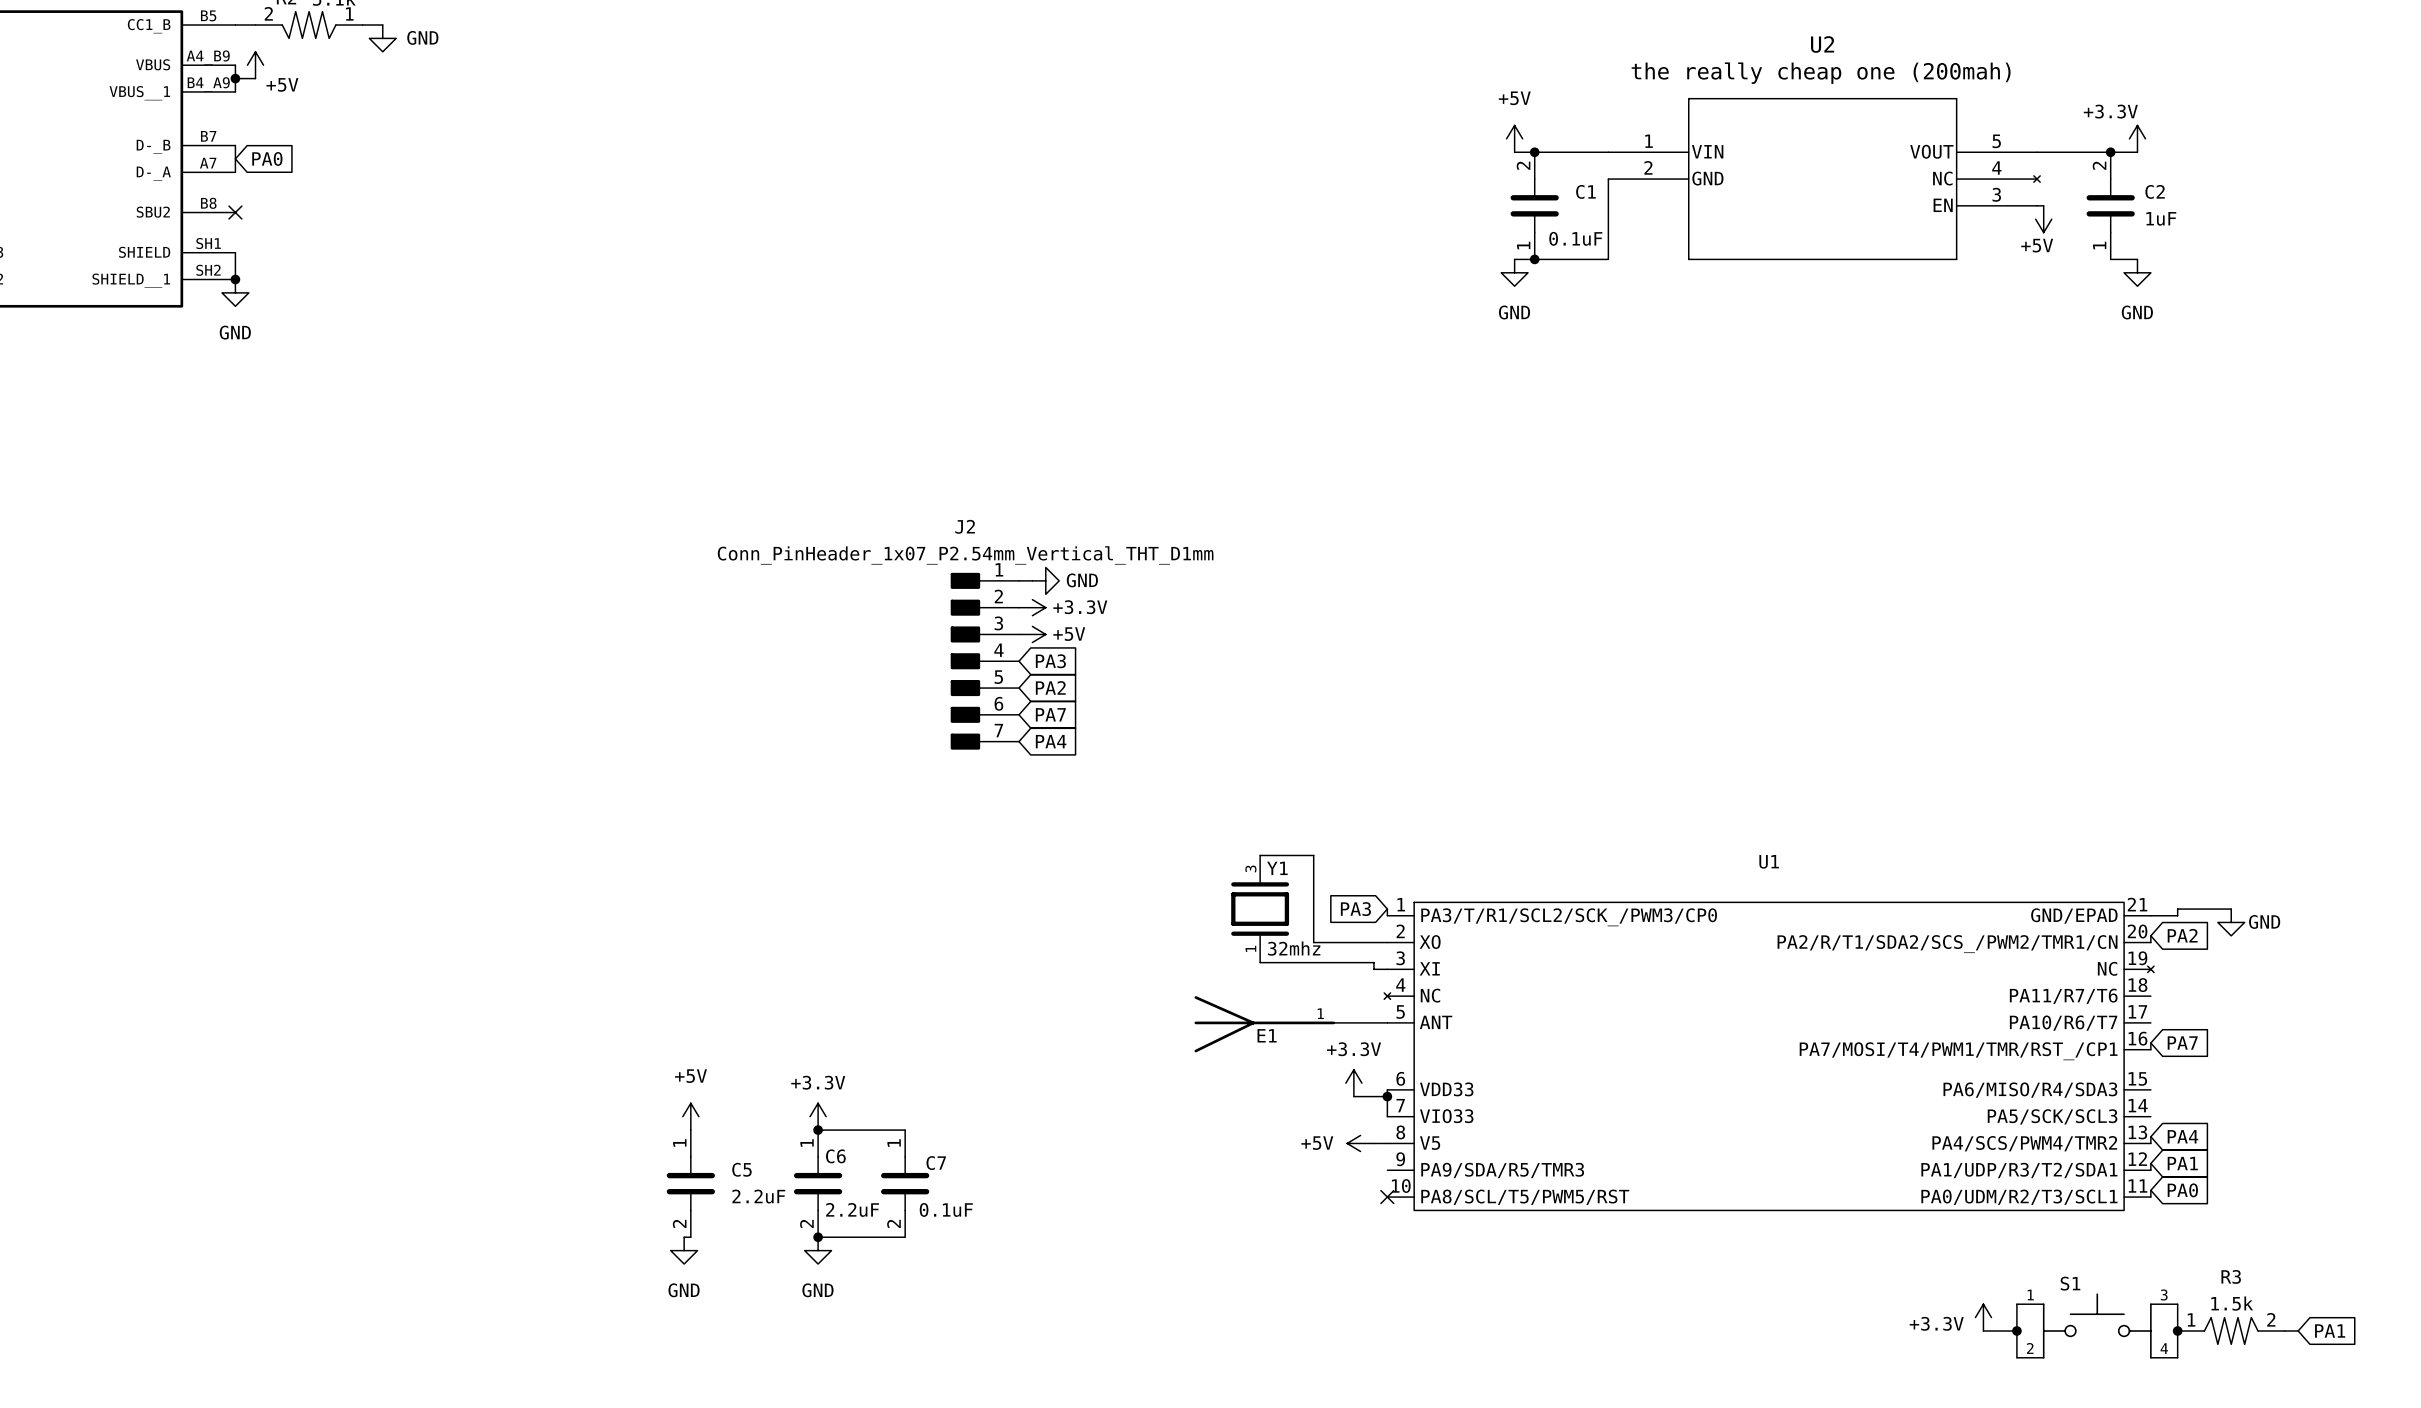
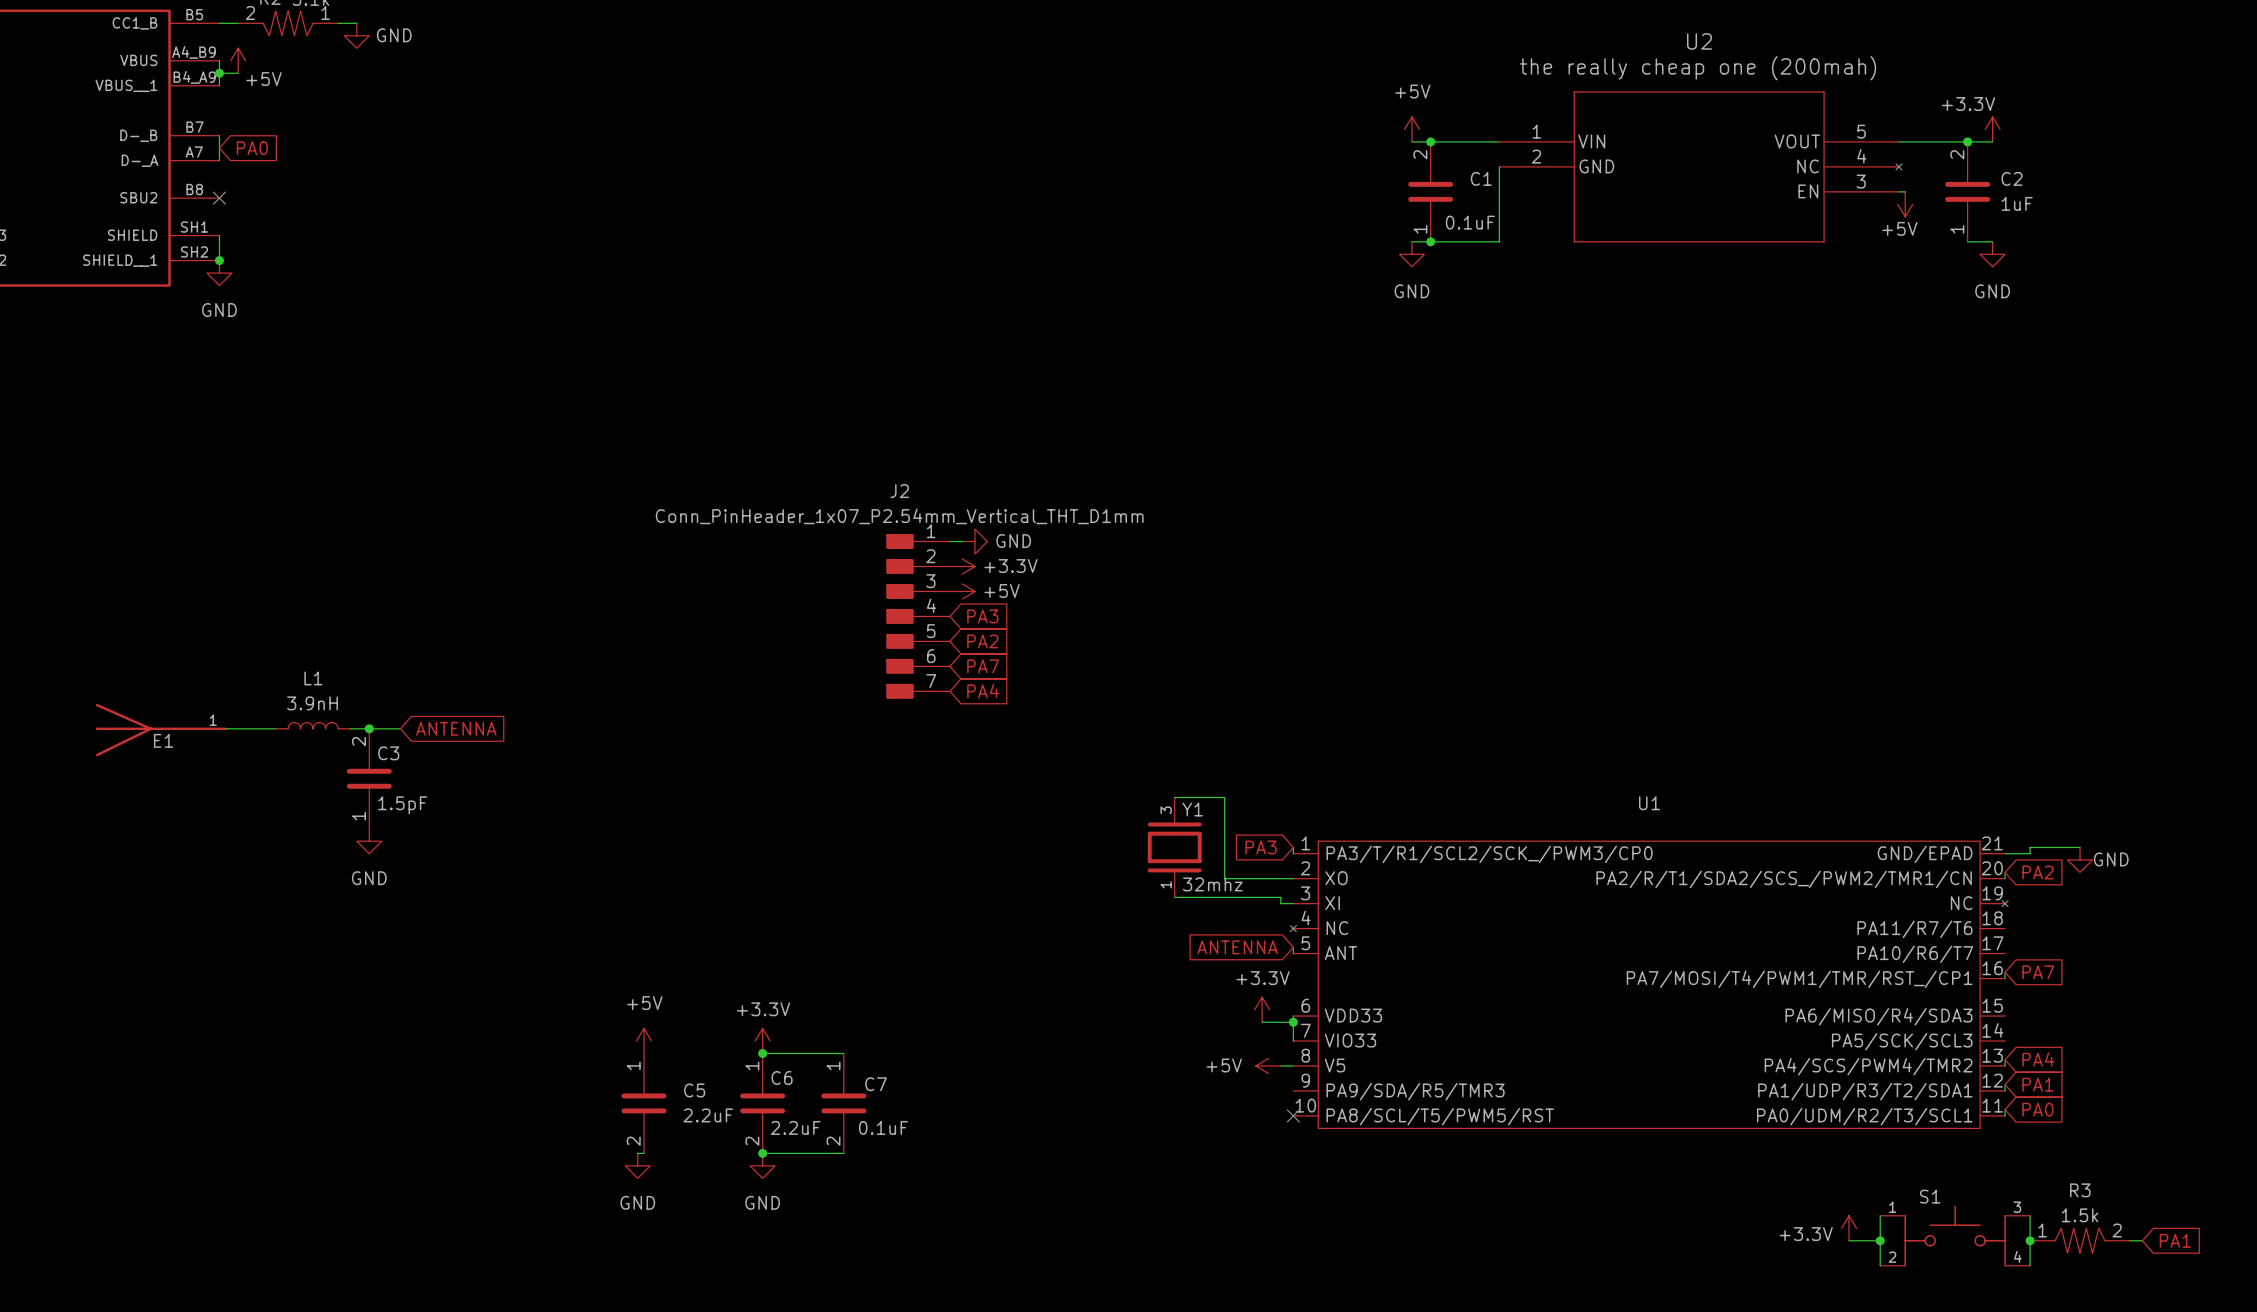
L1: none -> 3.9nH (313, 725)
wire: none -> (225, 728) (275, 728)
wire: none -> (350, 728) (400, 728)
junction: none -> (369, 728)
global label: none -> ANTENNA (456, 728)
C3: none -> 1.5pF (369, 778)
power symbol: none -> GND (369, 841)
global label: none -> ANTENNA (1237, 947)
wire: (1333, 1022) (1387, 1022) -> (1293, 947) (1293, 953)
E1 position: (1264, 1024) -> (161, 730)

